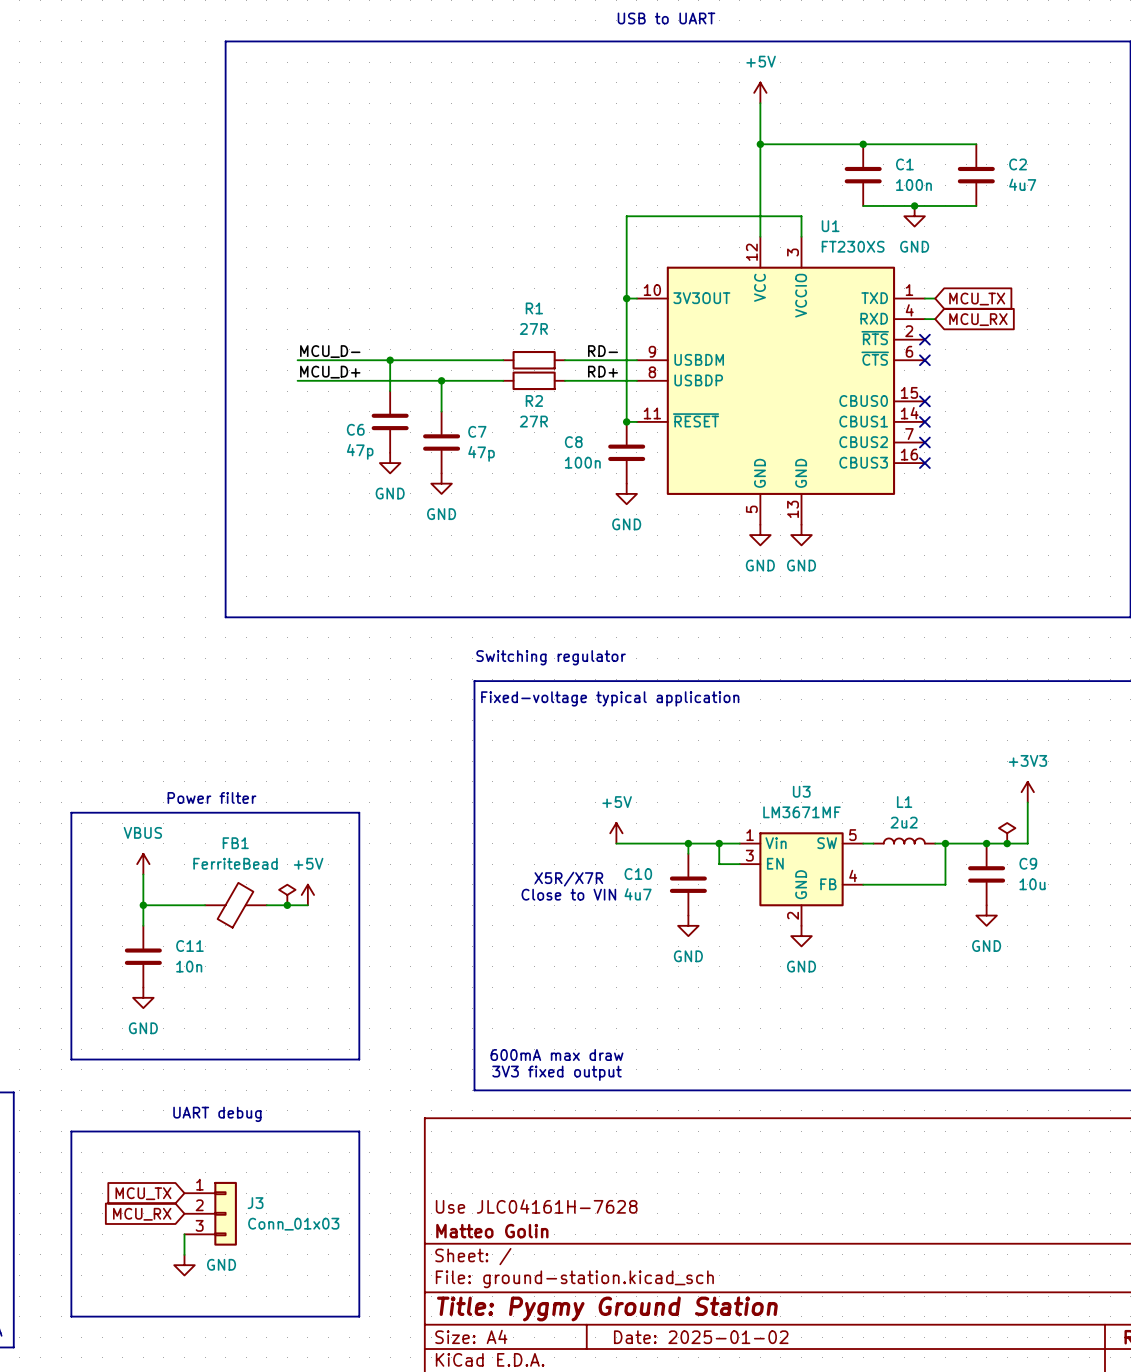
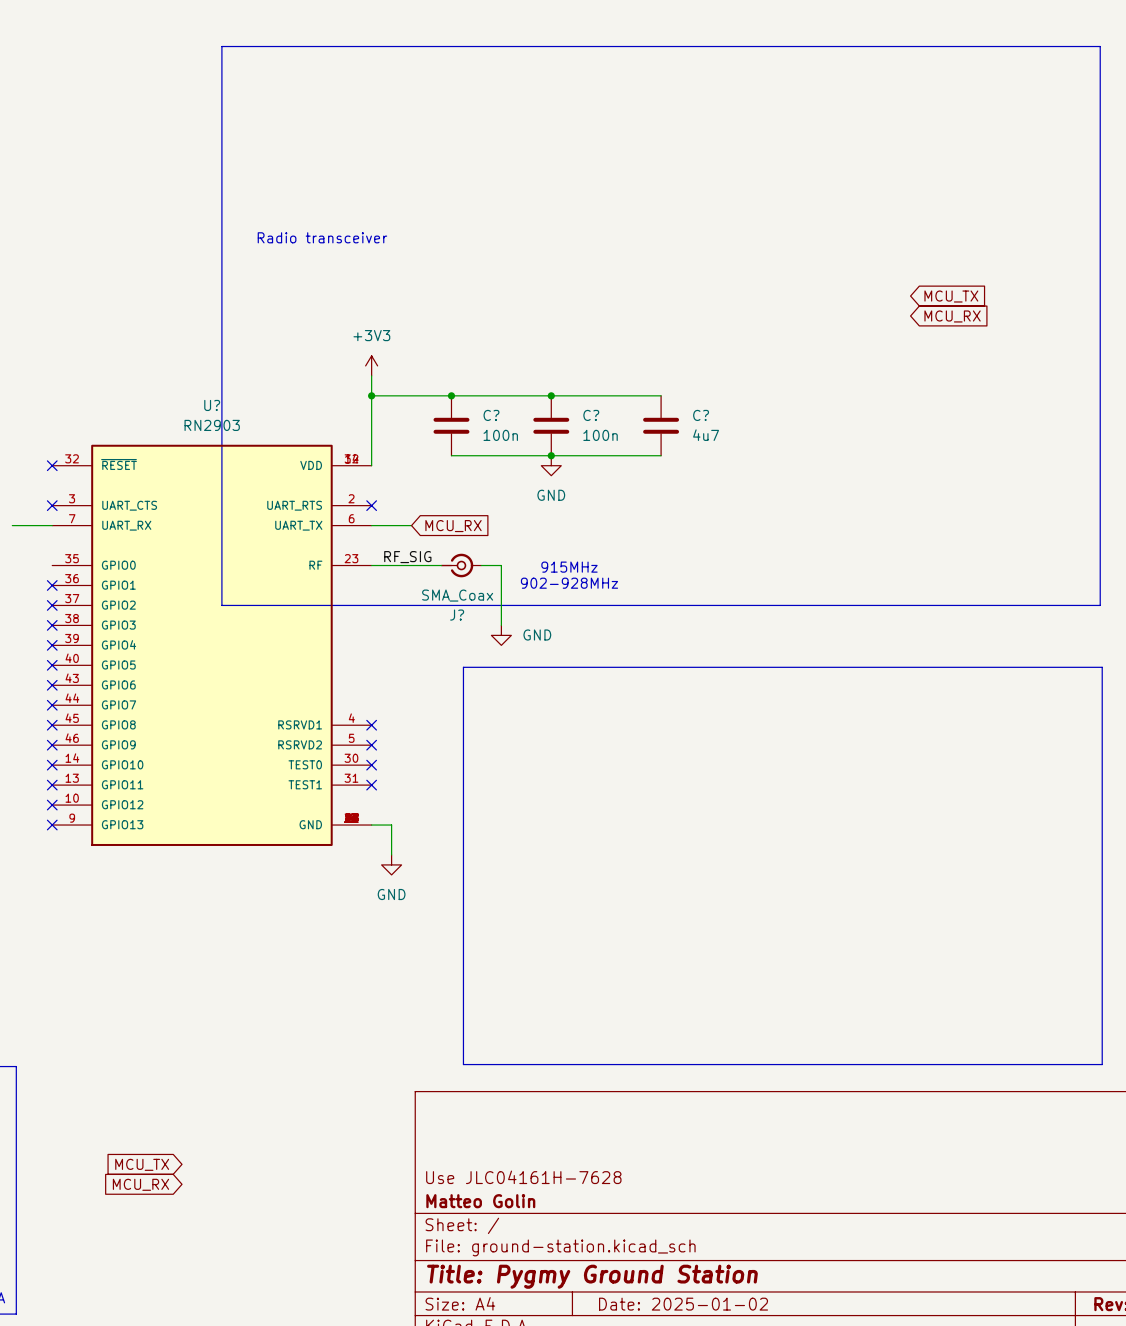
text: USB to UART (666, 18) -> none
power symbol: +5V (760, 92) -> none
wire: (760, 103) (760, 236) -> none
wire: (760, 144) (976, 144) -> none
junction: (760, 144) -> none
junction: (863, 144) -> none
C1: 100n (863, 175) -> none
C2: 4u7 (976, 175) -> none
wire: (863, 205) (976, 205) -> none
junction: (914, 205) -> none
power symbol: GND (914, 216) -> none
wire: (801, 236) (801, 216) (626, 216) (626, 421) (636, 421) -> none
text: none -> Radio transceiver (322, 237)
wire: (626, 298) (636, 298) -> none
junction: (626, 298) -> none
wire: (924, 298) (935, 298) -> none
wire: (924, 319) (935, 319) -> none
no-connect mark: (924, 339) -> none
label: MCU_D- (330, 351) -> none
label: RD- (603, 351) -> none
wire: (297, 360) (503, 360) -> none
wire: (390, 360) (390, 391) -> none
junction: (390, 360) -> none
R1: 27R (534, 360) -> none
wire: (564, 360) (636, 360) -> none
no-connect mark: (924, 360) -> none
power symbol: none -> +3V3 (371, 365)
label: RD+ (603, 371) -> none
label: MCU_D+ (330, 372) -> none
wire: (297, 380) (503, 380) -> none
wire: none -> (371, 375) (371, 465)
wire: (441, 380) (441, 411) -> none
junction position: (441, 380) -> (451, 395)
R2: 27R (534, 380) -> none
wire: (564, 380) (636, 380) -> none
U1: FT230XS (780, 380) -> none
wire: none -> (371, 395) (661, 395)
junction: none -> (371, 395)
junction: none -> (551, 395)
no-connect mark: (924, 401) -> none
C6: 47p (390, 421) -> none
junction: (626, 421) -> none
no-connect mark: (924, 421) -> none
C?: none -> 100n (451, 425)
C?: none -> 100n (551, 425)
C?: none -> 4u7 (661, 425)
C7: 47p (441, 442) -> none
no-connect mark: (924, 442) -> none
C8: 100n (626, 452) -> none
power symbol: GND (390, 463) -> none
wire: none -> (451, 455) (661, 455)
junction: none -> (551, 455)
no-connect mark: (924, 463) -> none
no-connect mark: none -> (52, 465)
power symbol: none -> GND (551, 465)
power symbol: GND (441, 483) -> none
power symbol: GND (626, 493) -> none
no-connect mark: none -> (52, 505)
no-connect mark: none -> (371, 505)
wire: none -> (12, 525) (52, 525)
wire: none -> (371, 525) (411, 525)
global label: none -> MCU_RX (453, 526)
power symbol: GND (760, 535) -> none
power symbol: GND (801, 535) -> none
label: none -> RF_SIG (407, 557)
wire: none -> (371, 565) (441, 565)
J?: none -> SMA_Coax (461, 565)
wire: none -> (481, 565) (501, 565) (501, 625)
text: none -> 915MHz (569, 567)
text: none -> 902-928MHz (569, 583)
no-connect mark: none -> (52, 585)
no-connect mark: none -> (52, 605)
no-connect mark: none -> (52, 625)
power symbol: none -> GND (501, 635)
text: Switching regulator (551, 657) -> none
no-connect mark: none -> (52, 645)
U?: none -> RN2903 (211, 645)
no-connect mark: none -> (52, 665)
text: Fixed-voltage typical application (610, 698) -> none
no-connect mark: none -> (52, 685)
no-connect mark: none -> (52, 705)
no-connect mark: none -> (52, 725)
no-connect mark: none -> (371, 725)
no-connect mark: none -> (52, 745)
no-connect mark: none -> (371, 745)
no-connect mark: none -> (52, 765)
no-connect mark: none -> (371, 765)
power symbol: +3V3 (1027, 792) -> none
text: Power filter (211, 797) -> none
no-connect mark: none -> (52, 785)
no-connect mark: none -> (371, 785)
wire: (1027, 802) (1027, 843) (935, 843) -> none
line: (71, 812) (359, 812) (359, 1059) (71, 1059) (71, 812) -> none
no-connect mark: none -> (52, 805)
power symbol: +5V (616, 833) -> none
power symbol: (1007, 833) -> none
L1: 2u2 (904, 841) -> none
no-connect mark: none -> (52, 825)
wire: none -> (371, 825) (391, 825) (391, 854)
wire: (616, 843) (739, 843) -> none
wire: (688, 843) (688, 853) -> none
junction: (688, 843) -> none
wire: (719, 843) (719, 864) (739, 864) -> none
junction: (719, 843) -> none
wire: (863, 843) (873, 843) -> none
wire: (945, 843) (945, 884) (863, 884) -> none
junction: (945, 843) -> none
junction: (986, 843) -> none
junction: (1007, 843) -> none
power symbol: VBUS (143, 864) -> none
wire: (143, 874) (143, 925) -> none
C9: 10u (986, 874) -> none
text: X5R/X7R (568, 879) -> none
U3: LM3671MF (801, 879) -> none
power symbol: none -> GND (391, 864)
C10: 4u7 (688, 884) -> none
power symbol: (287, 894) -> none
power symbol: +5V (307, 894) -> none
text: Close to VIN (568, 894) -> none
wire: (143, 905) (205, 905) -> none
junction: (143, 905) -> none
FB1: FerriteBead (235, 905) -> none
wire: (266, 905) (307, 905) -> none
junction: (287, 905) -> none
power symbol: GND (986, 915) -> none
power symbol: GND (688, 925) -> none
power symbol: GND (801, 936) -> none
C11: 10n (143, 956) -> none
power symbol: GND (143, 997) -> none
text: 600mA max draw (557, 1055) -> none
text: 3V3 fixed output (557, 1073) -> none
text: UART debug (217, 1114) -> none
line: (71, 1131) (71, 1316) (359, 1316) (359, 1131) (71, 1131) -> none
J3: Conn_01x03 (210, 1213) -> none
wire: (184, 1234) (184, 1254) -> none
power symbol: GND (184, 1265) -> none

